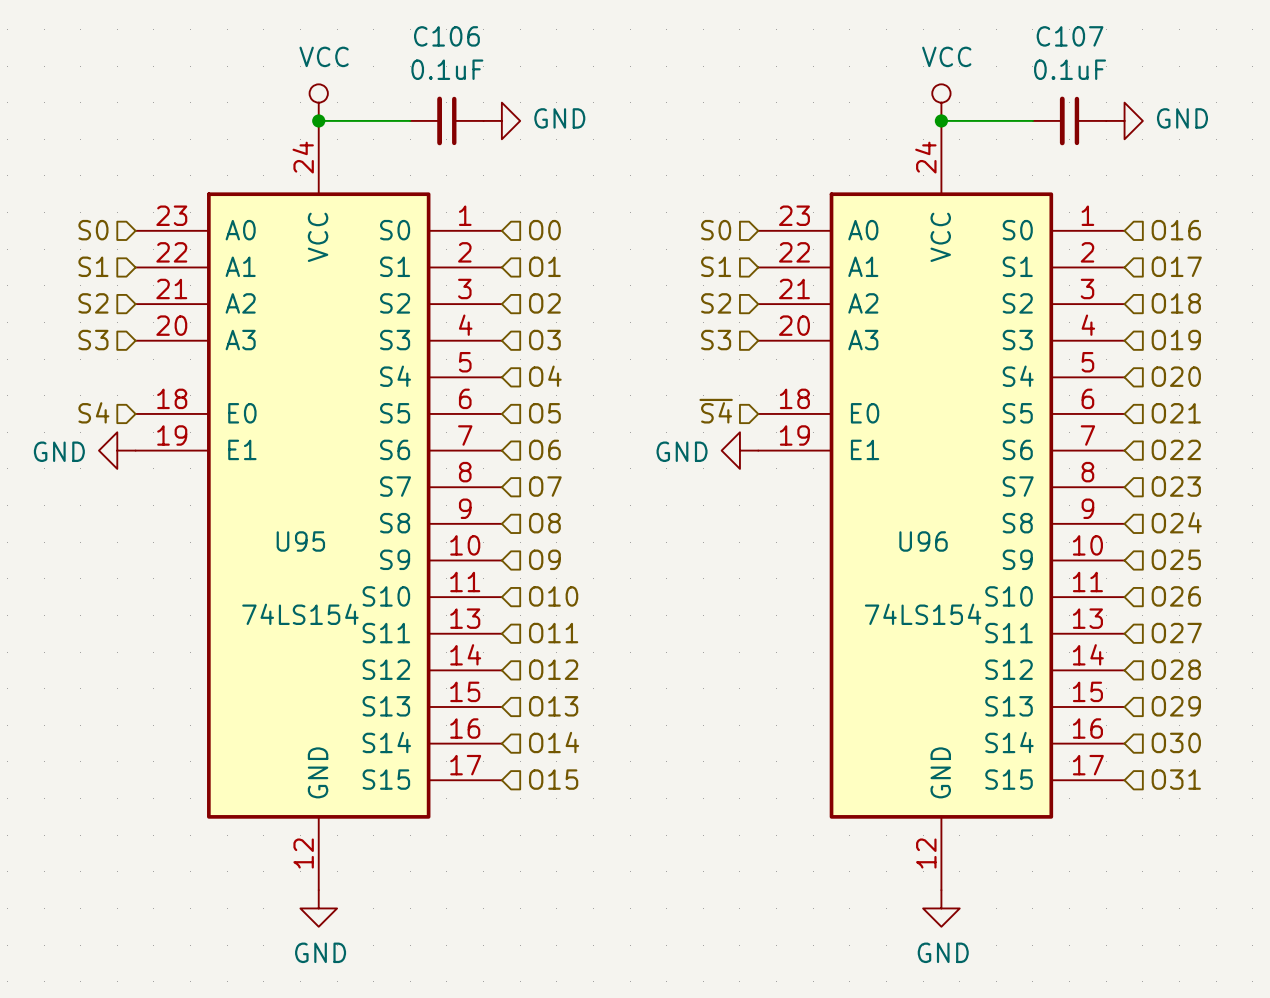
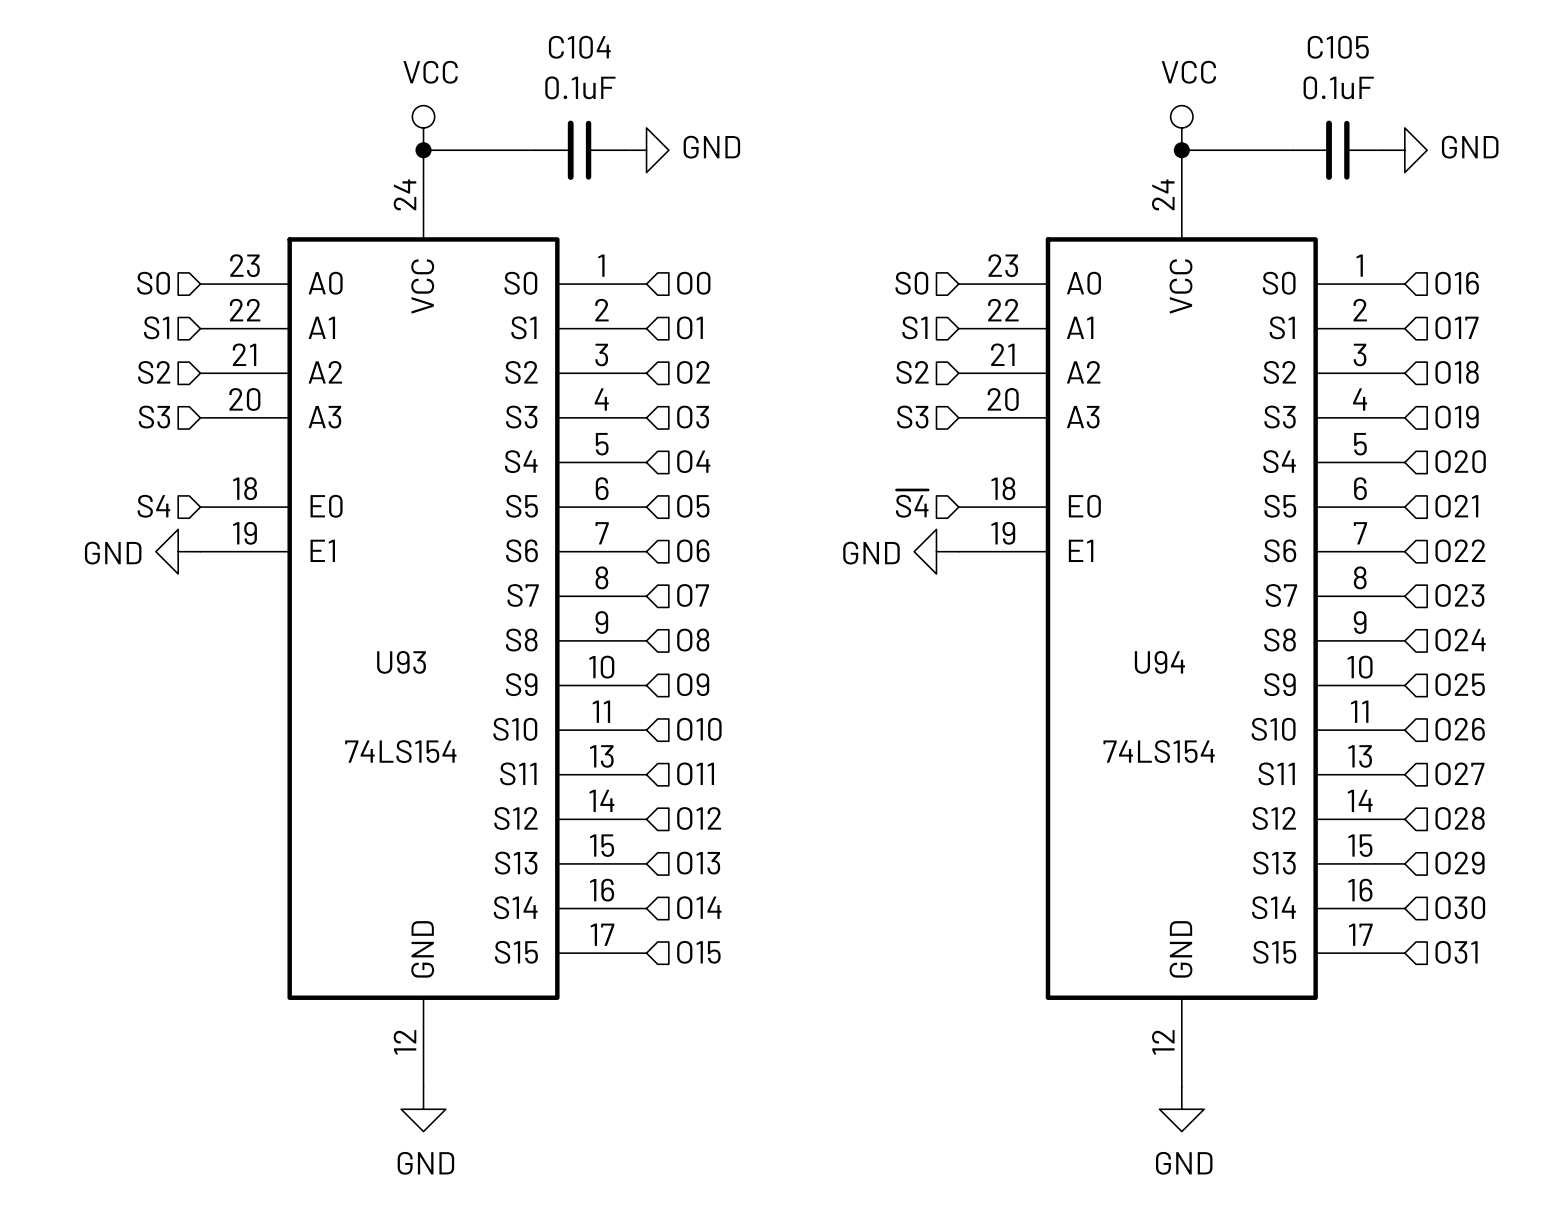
C106 name: C106 (446, 36) -> C104 (579, 47)
C107 name: C107 (1070, 36) -> C105 (1338, 47)
U95 name: U95 (300, 541) -> U93 (401, 662)
U96 name: U96 (923, 541) -> U94 (1159, 662)

